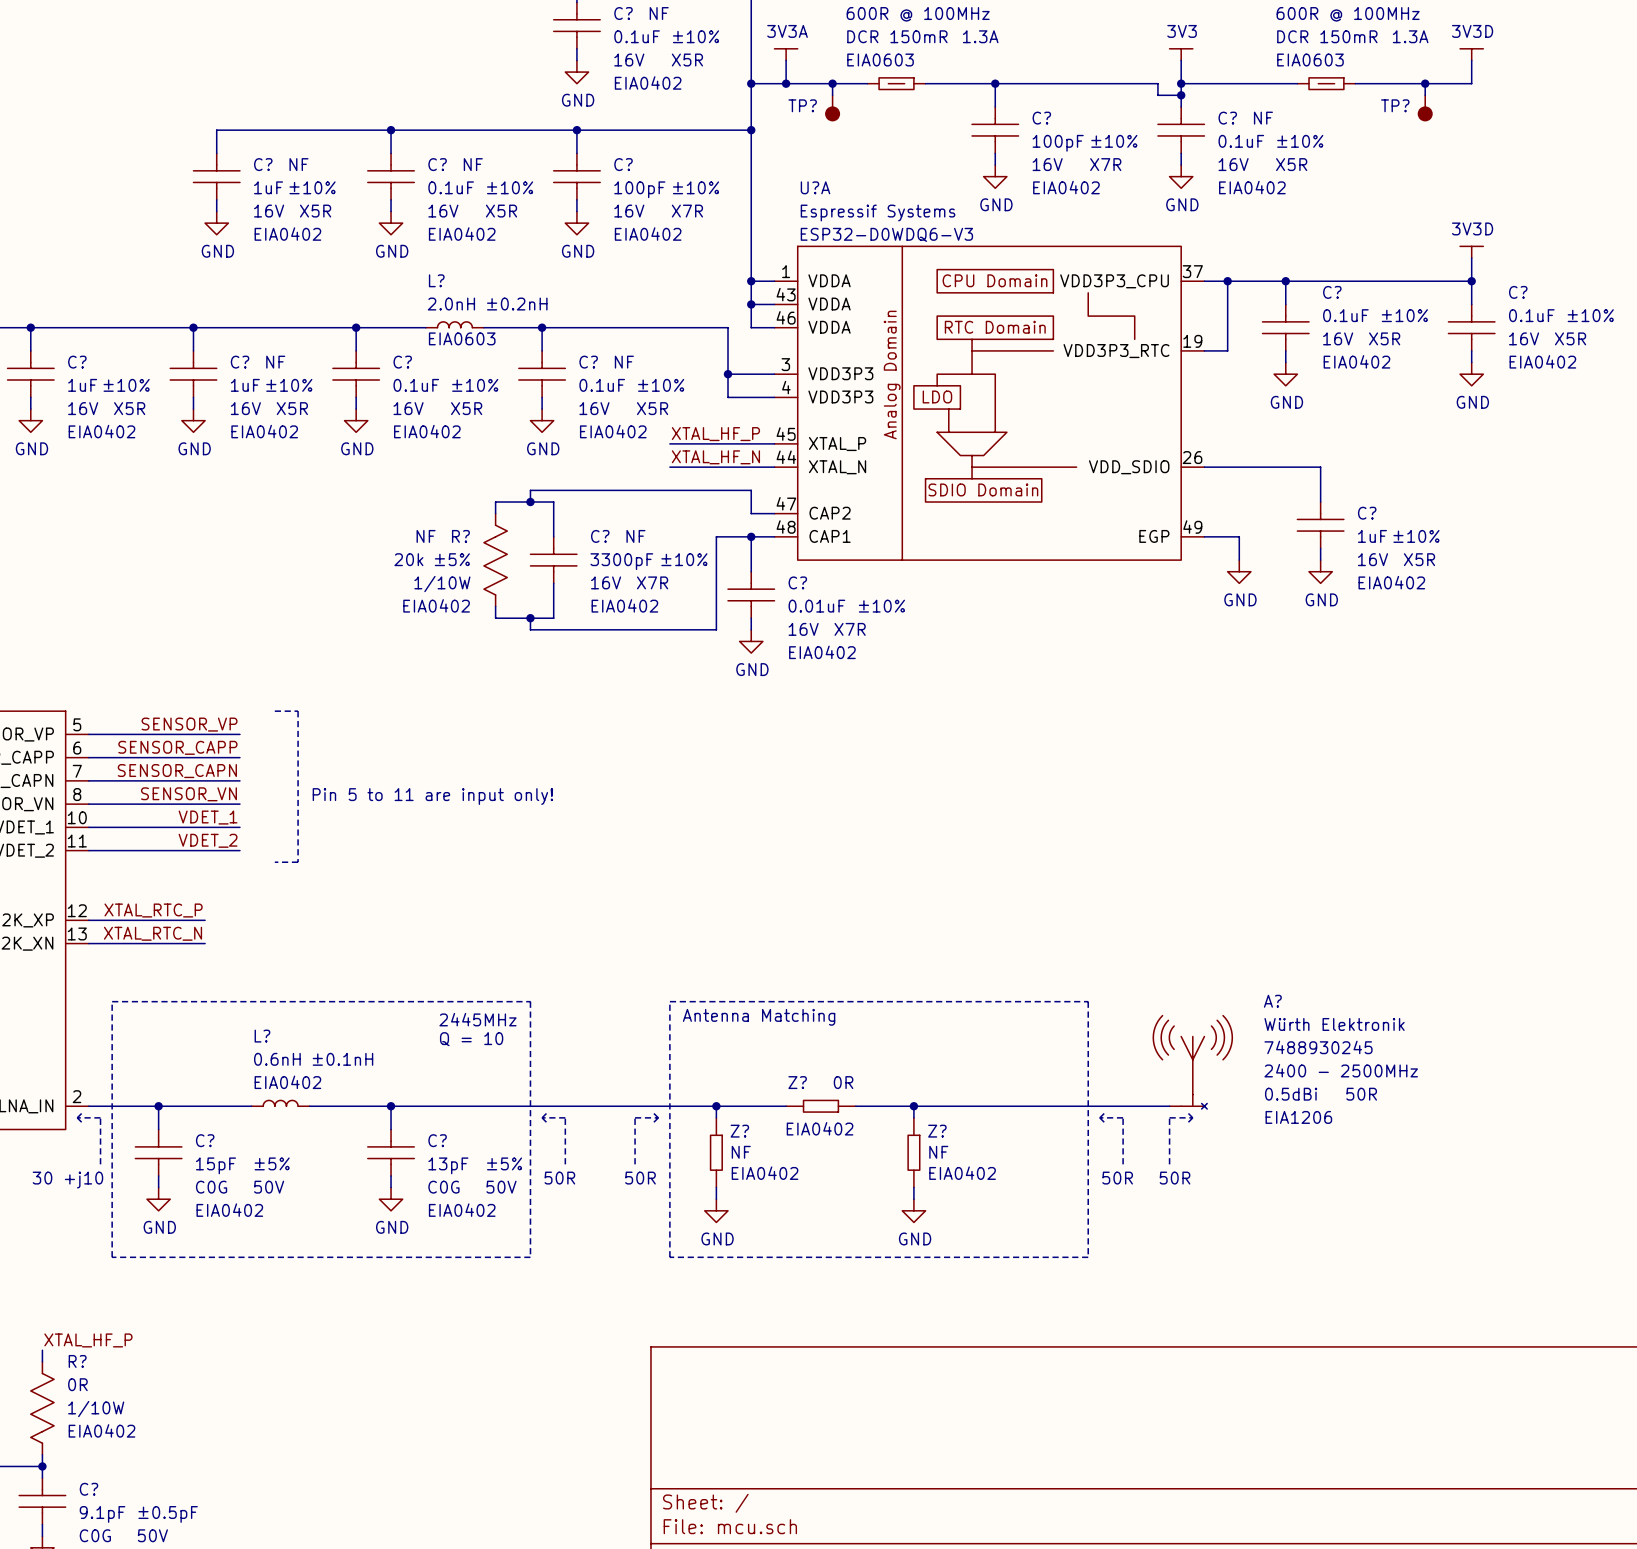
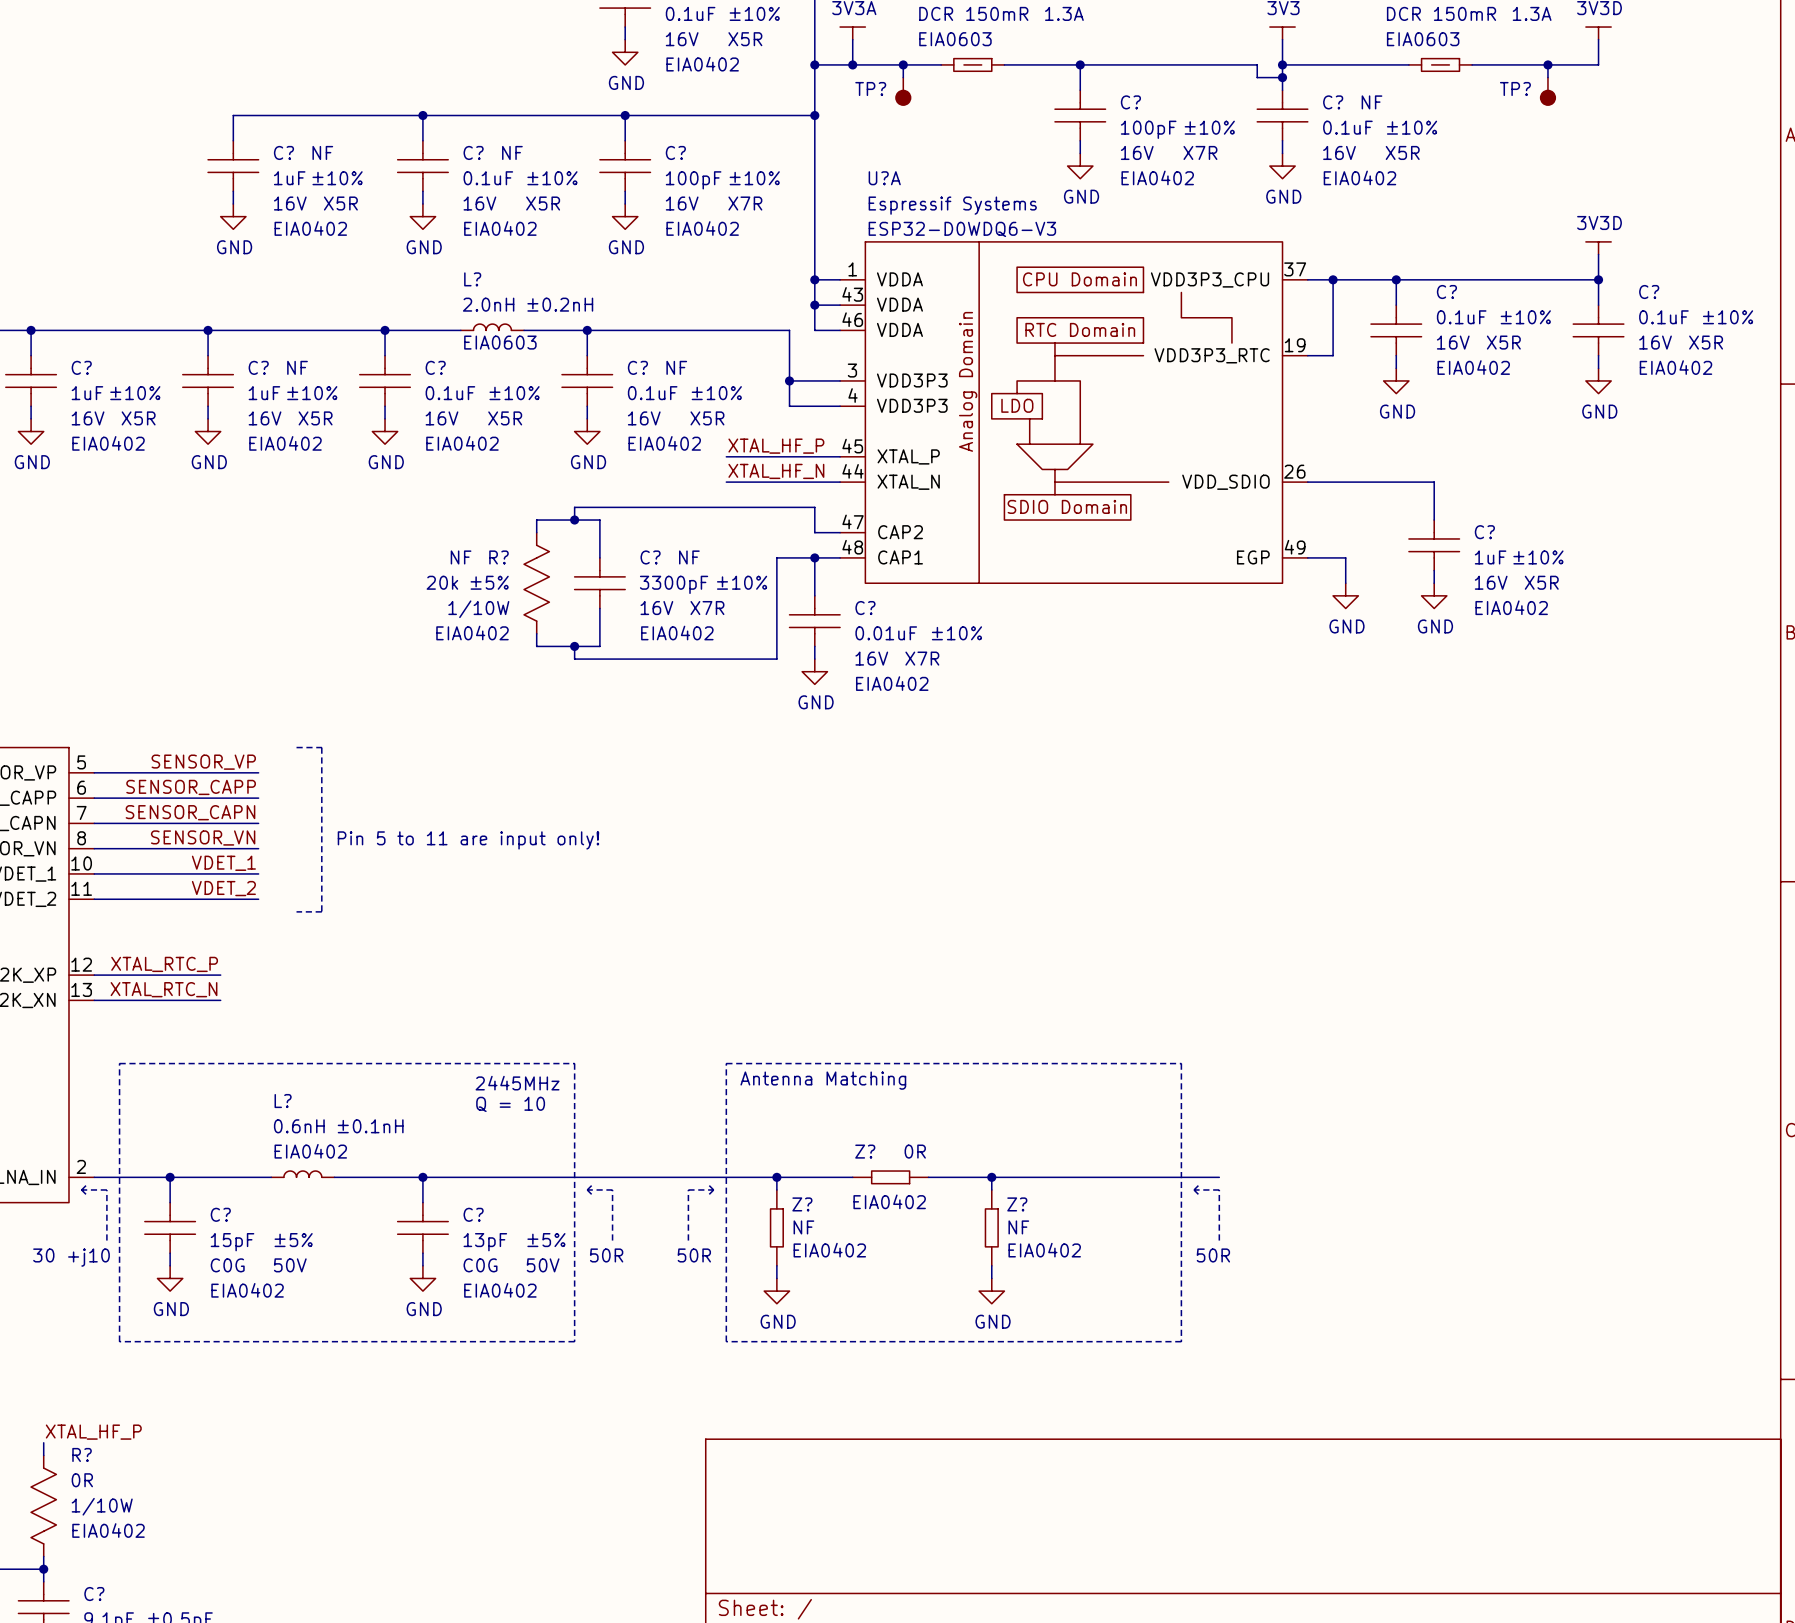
A?: (1192, 1062) -> none
wire: (1123, 1106) (1169, 1106) -> none
line: (1187, 1112) (1192, 1117) -> none
line: (1192, 1117) (1169, 1117) (1169, 1164) -> none
line: (1192, 1117) (1187, 1123) -> none
text: 50R (1175, 1178) -> none

